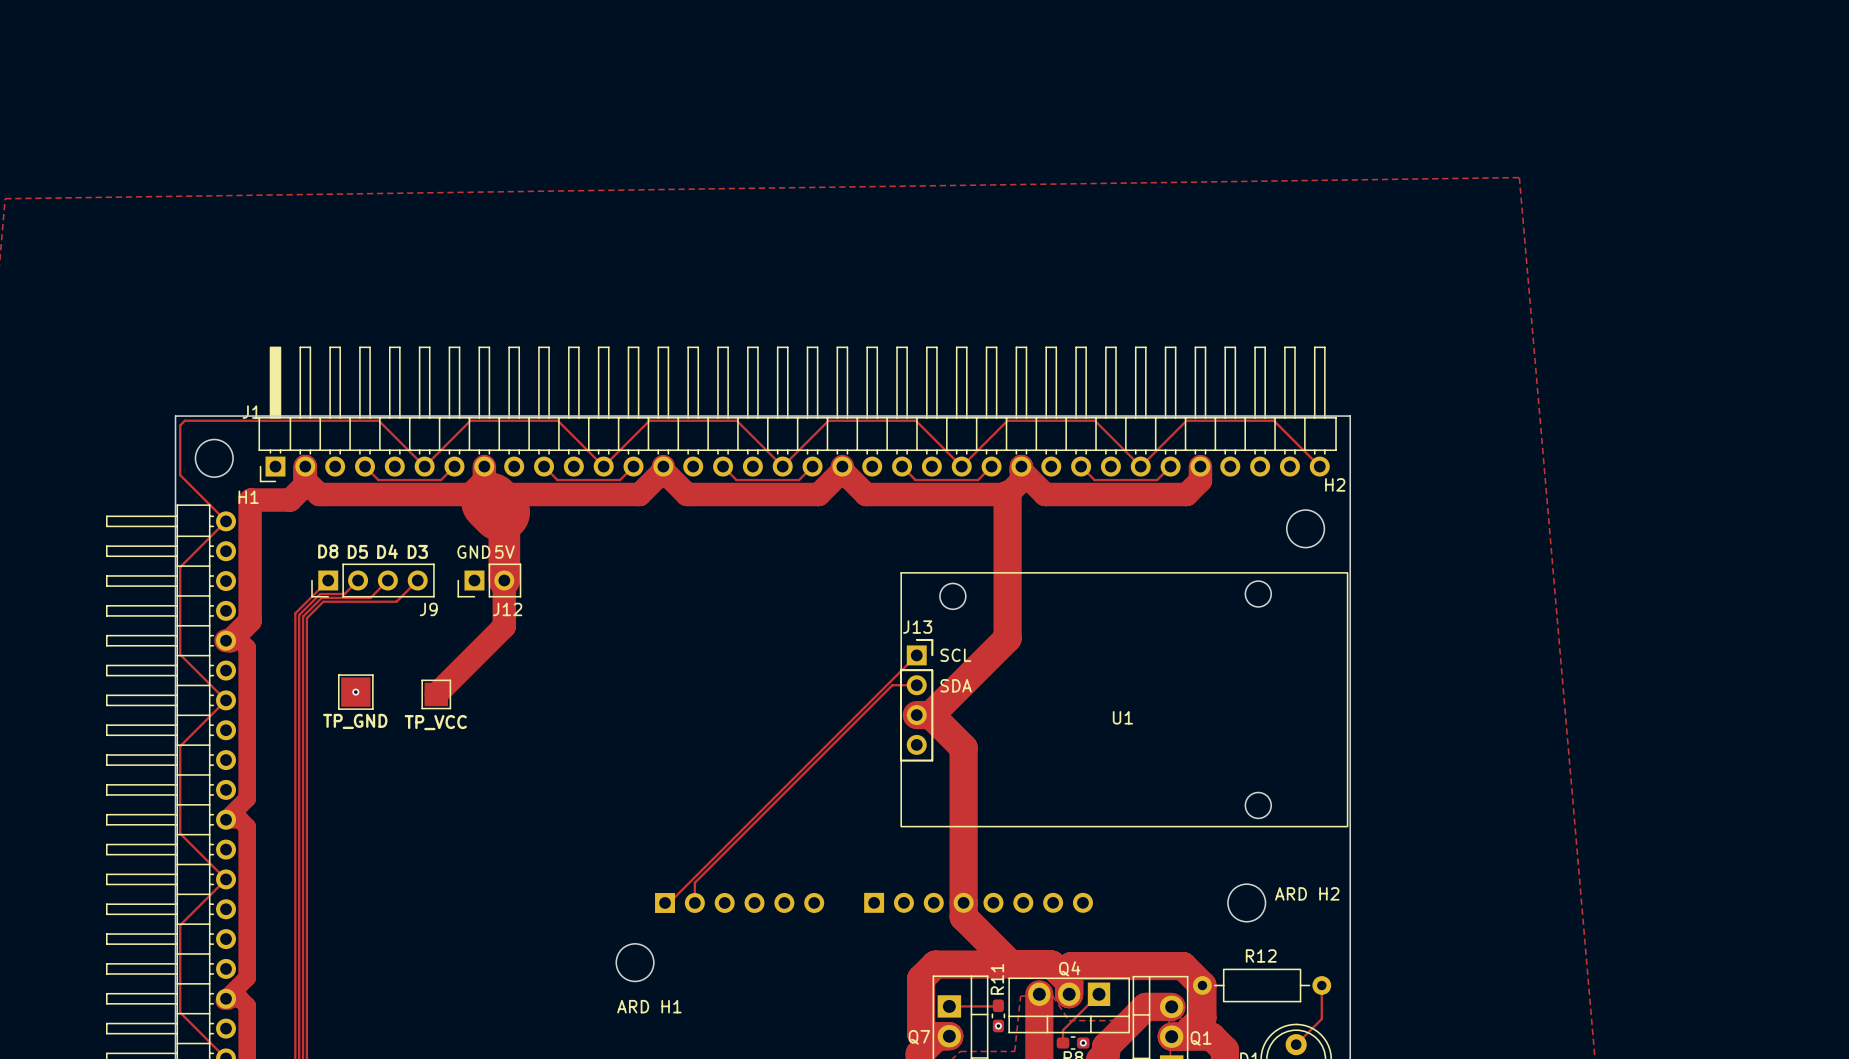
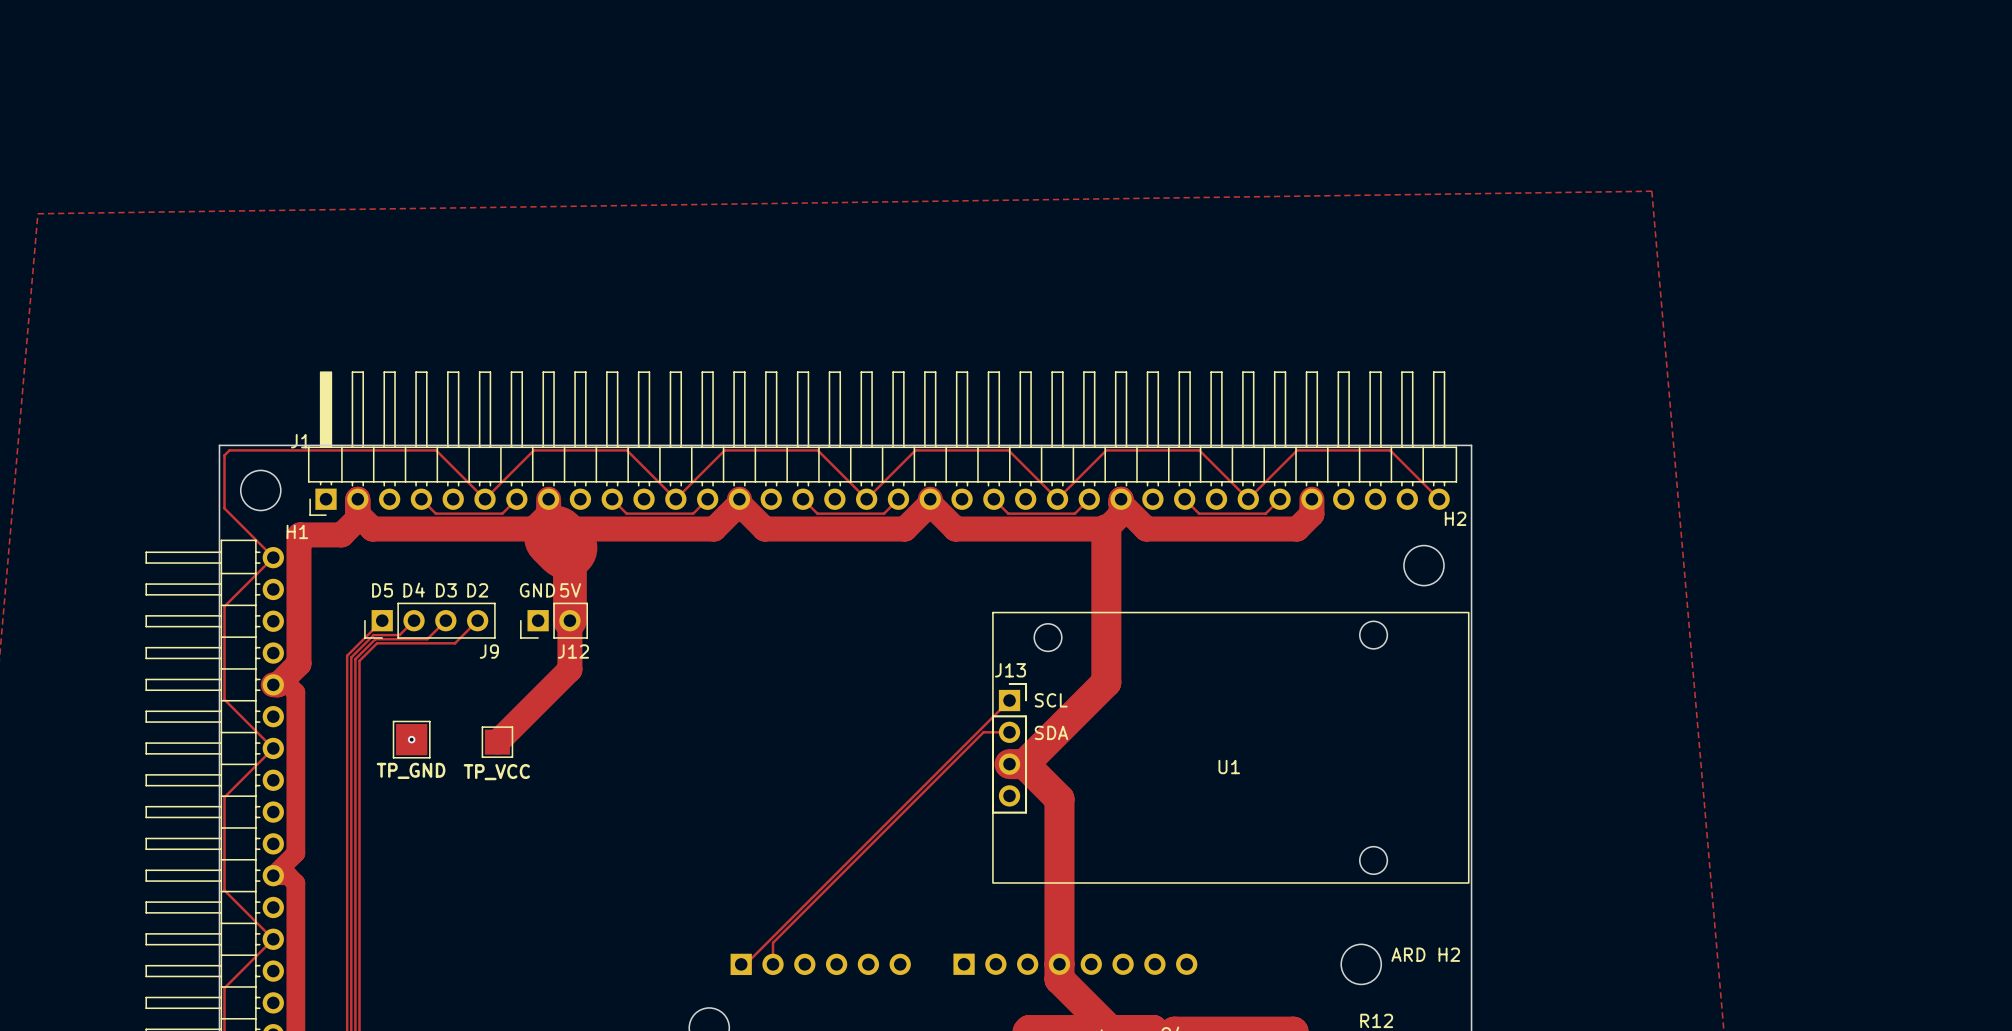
text: D8 (328, 551) -> D5 (382, 590)
text: D5 (357, 551) -> D4 (414, 590)
text: D4 (387, 551) -> D3 (446, 590)
text: D3 (417, 551) -> D2 (477, 590)

